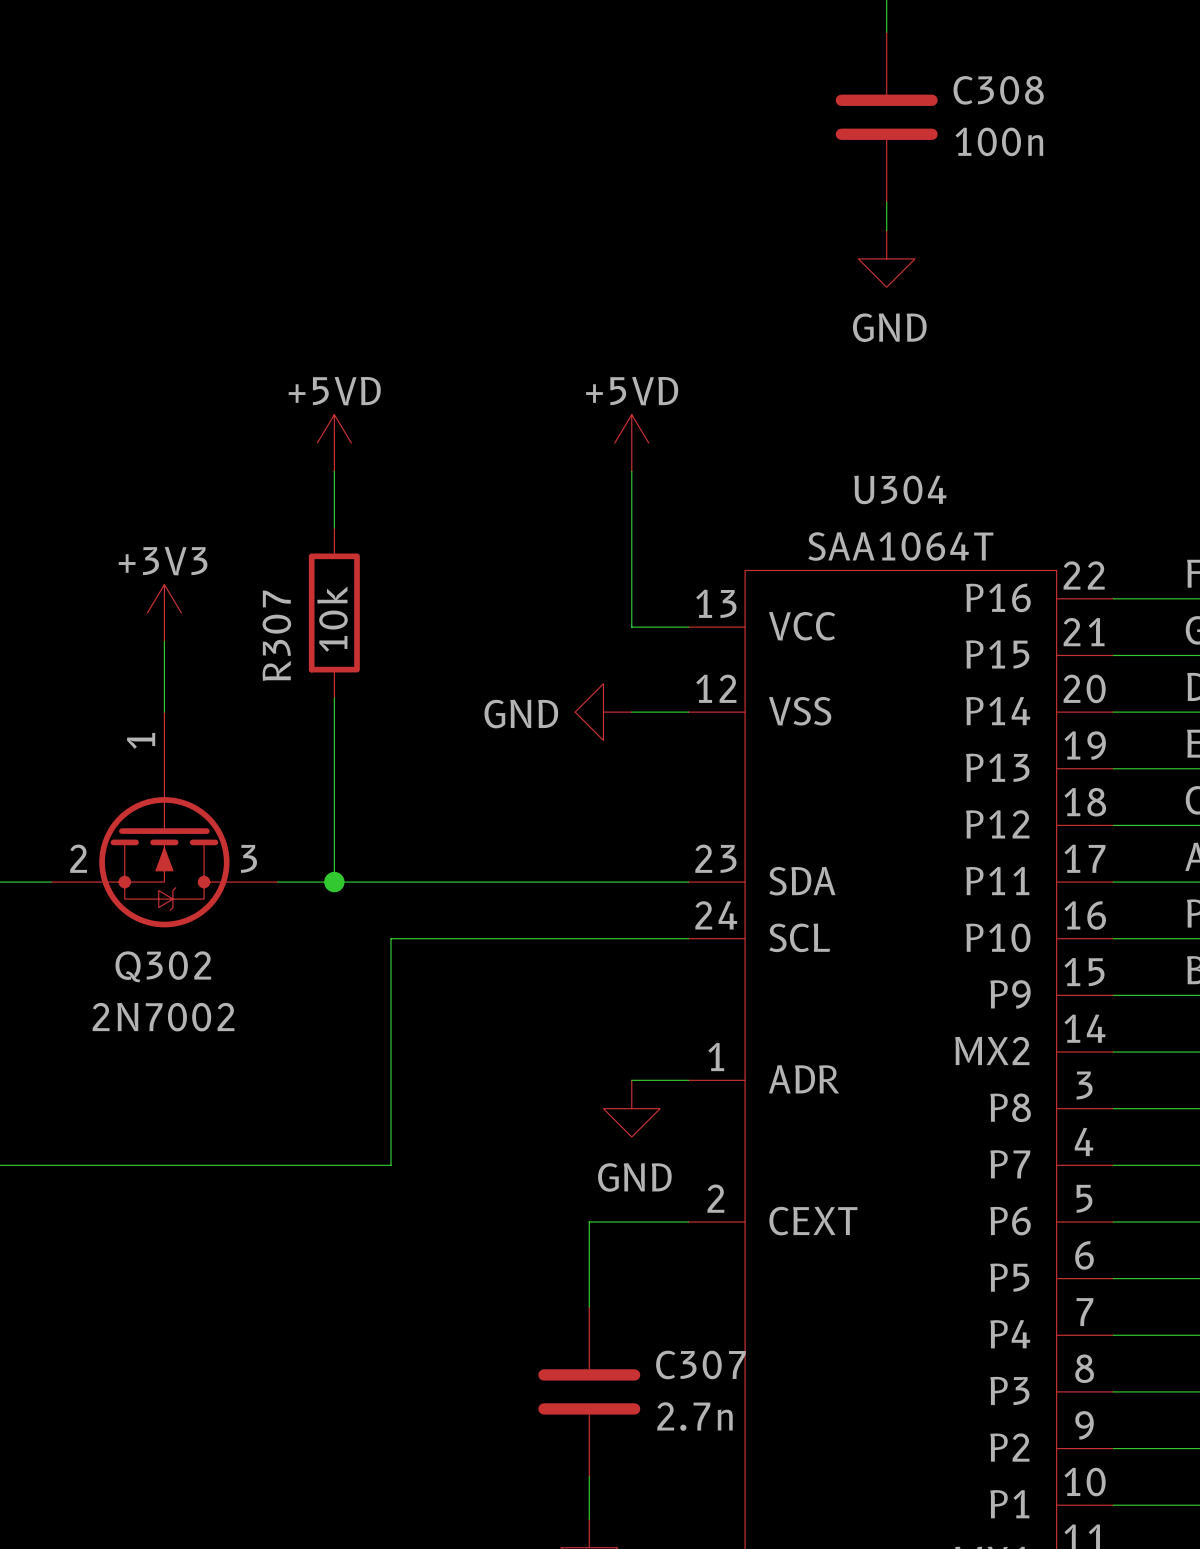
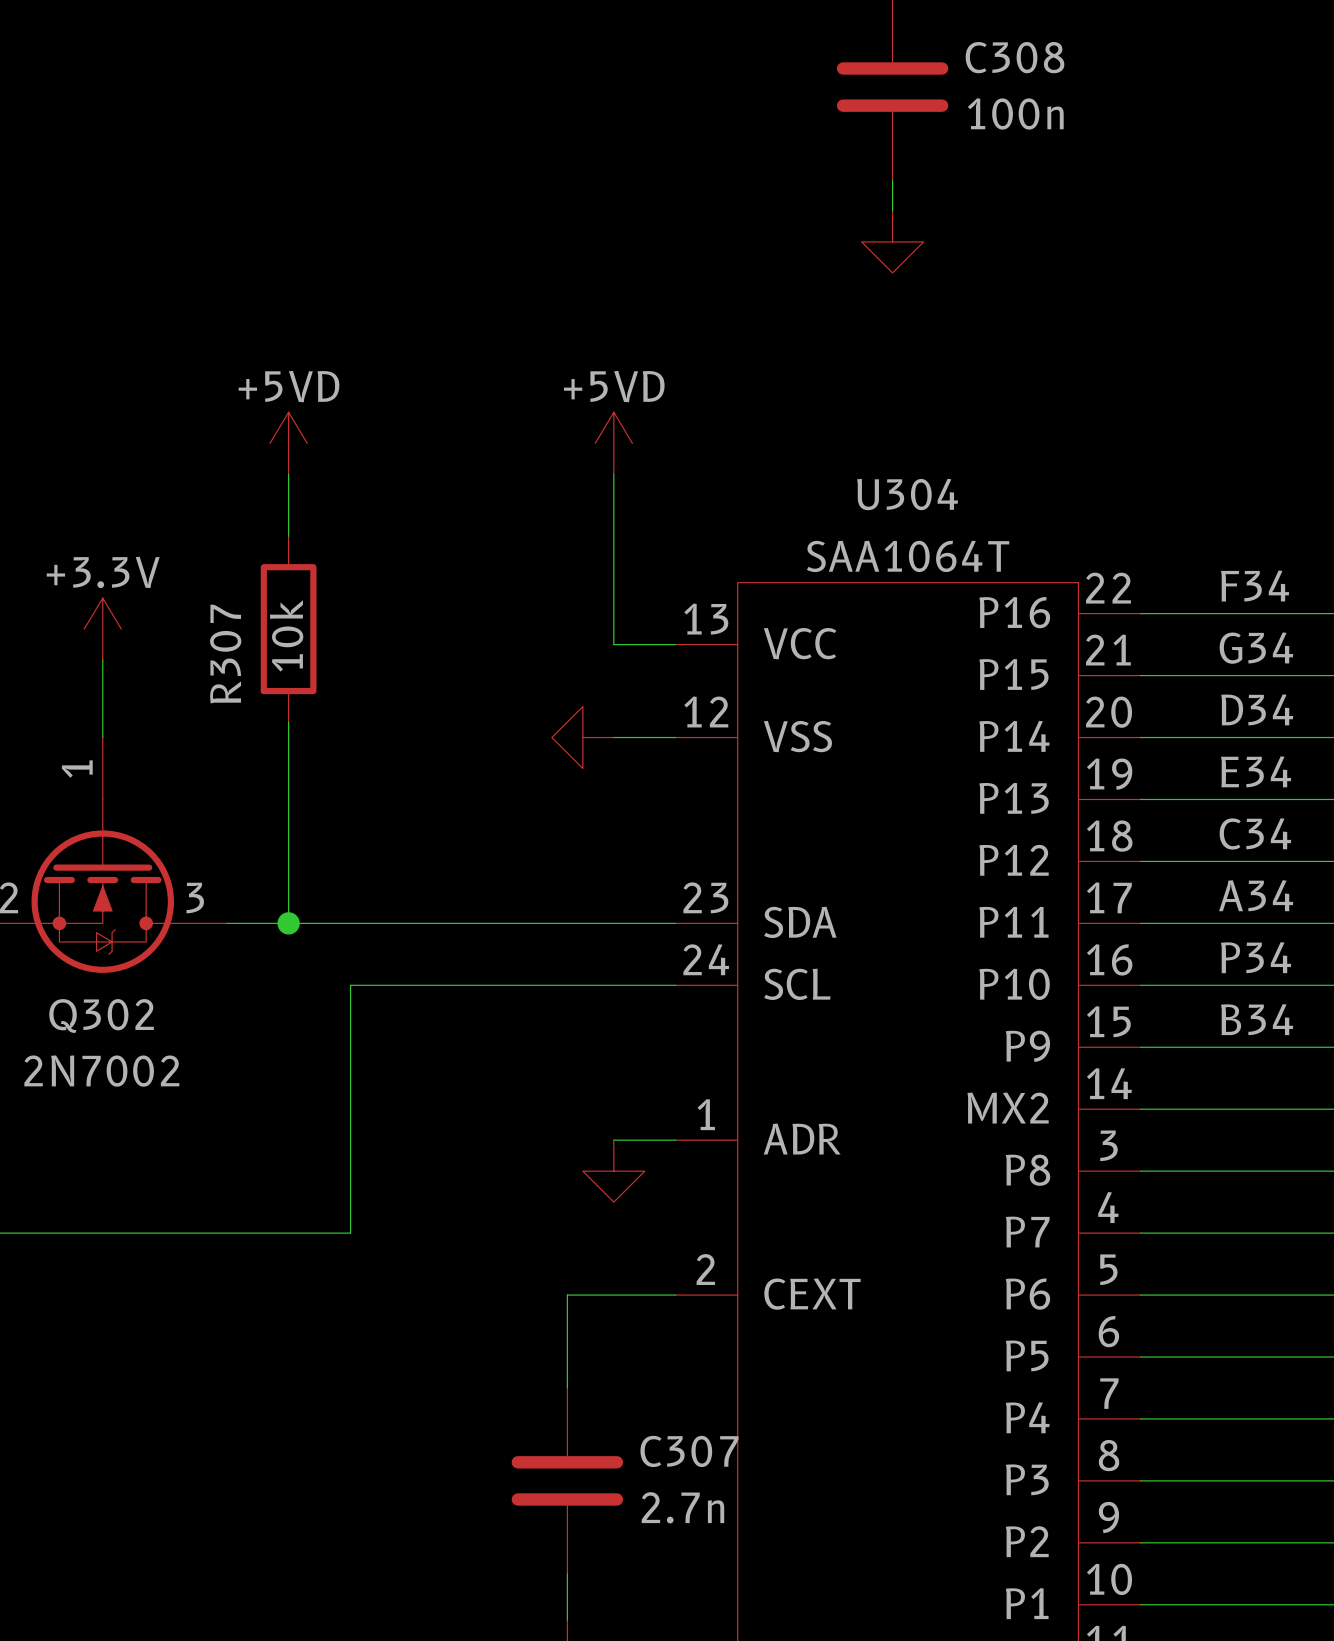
power symbol text: GND (889, 327) -> none
power symbol: +3V3 (164, 612) -> +3.3V (102, 629)
power symbol text: GND (521, 714) -> none
power symbol text: GND (634, 1177) -> none

